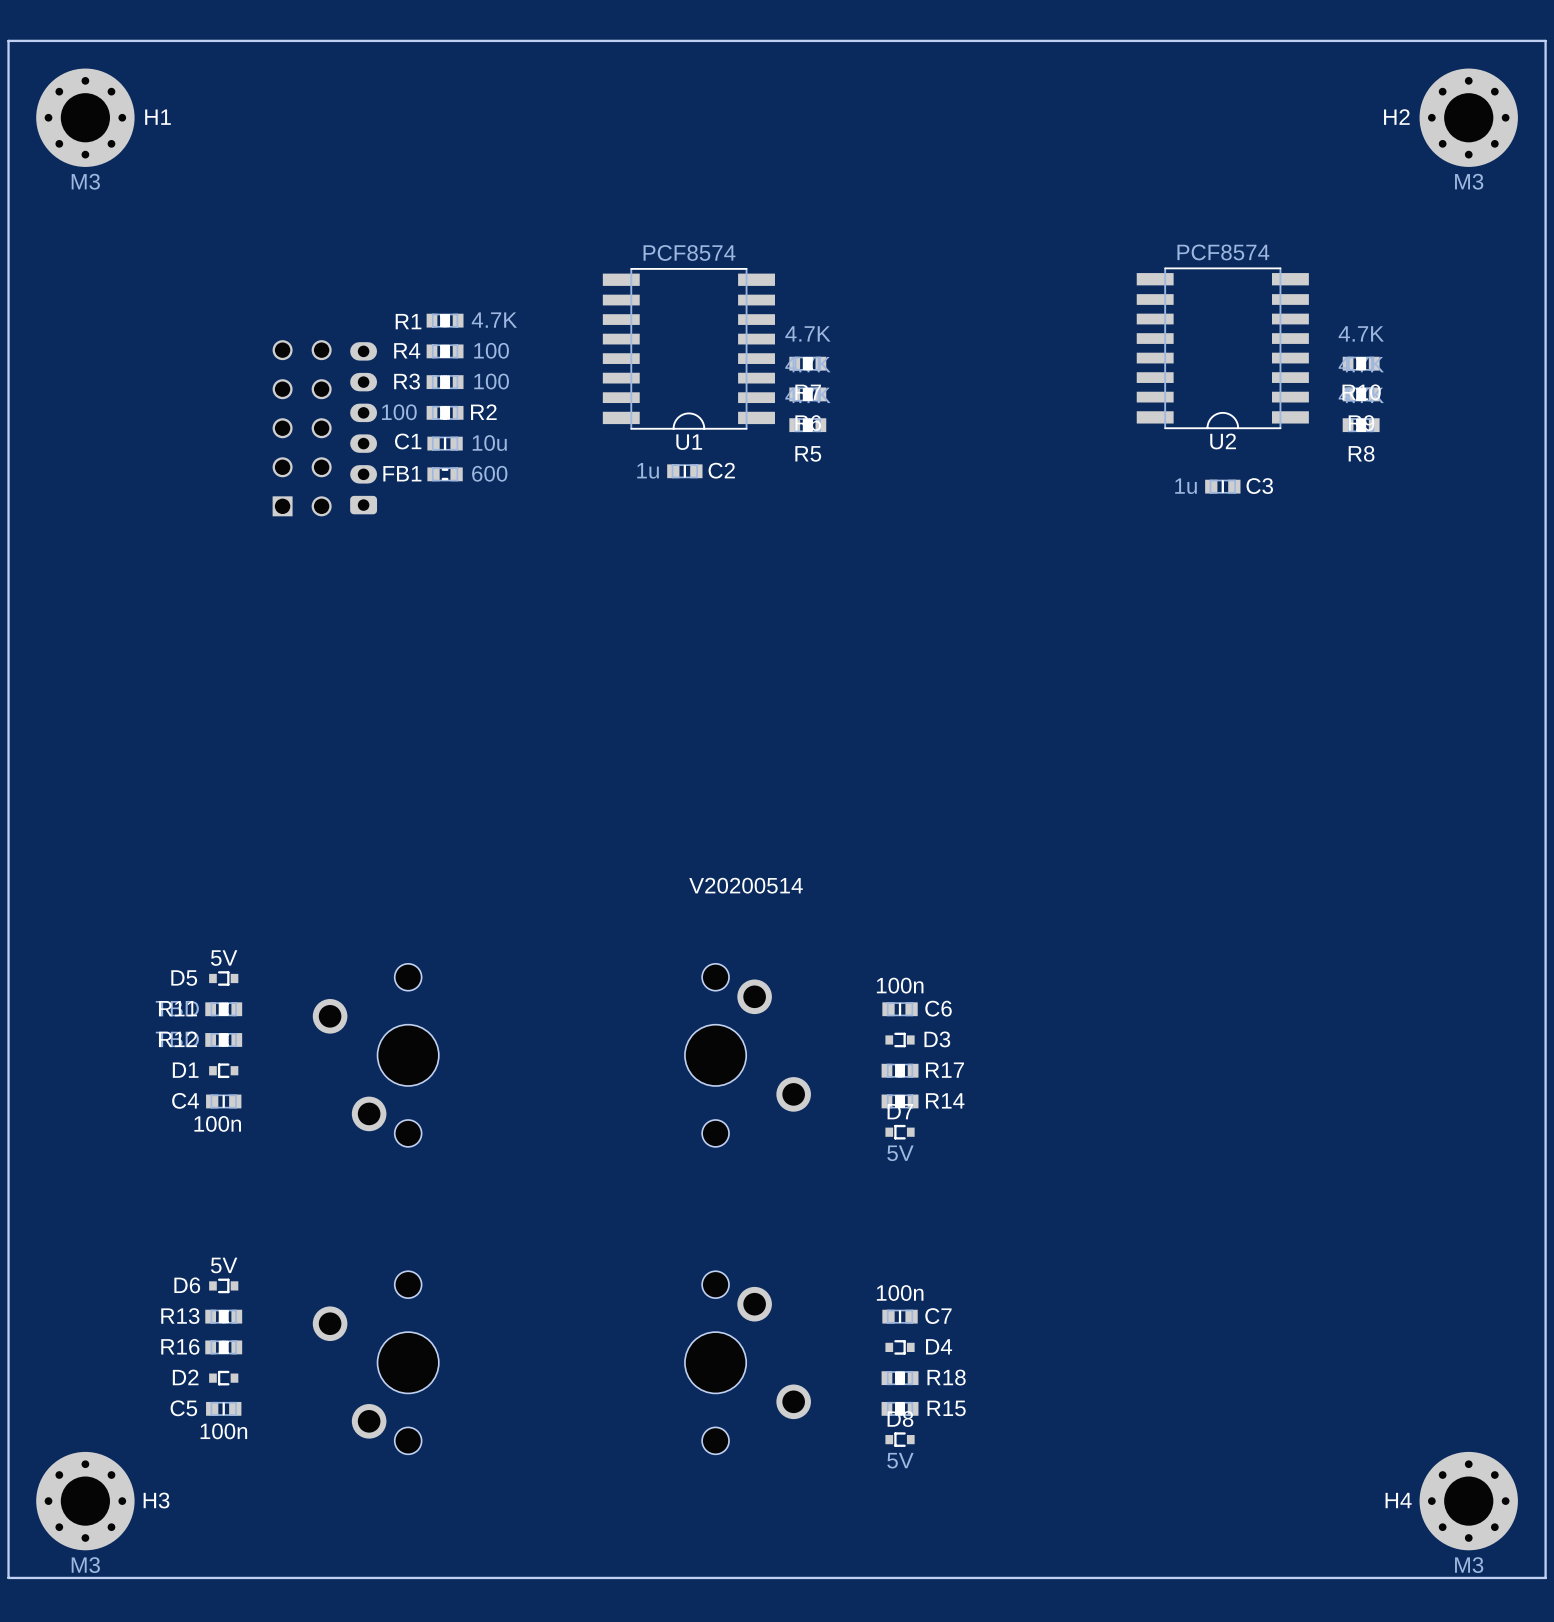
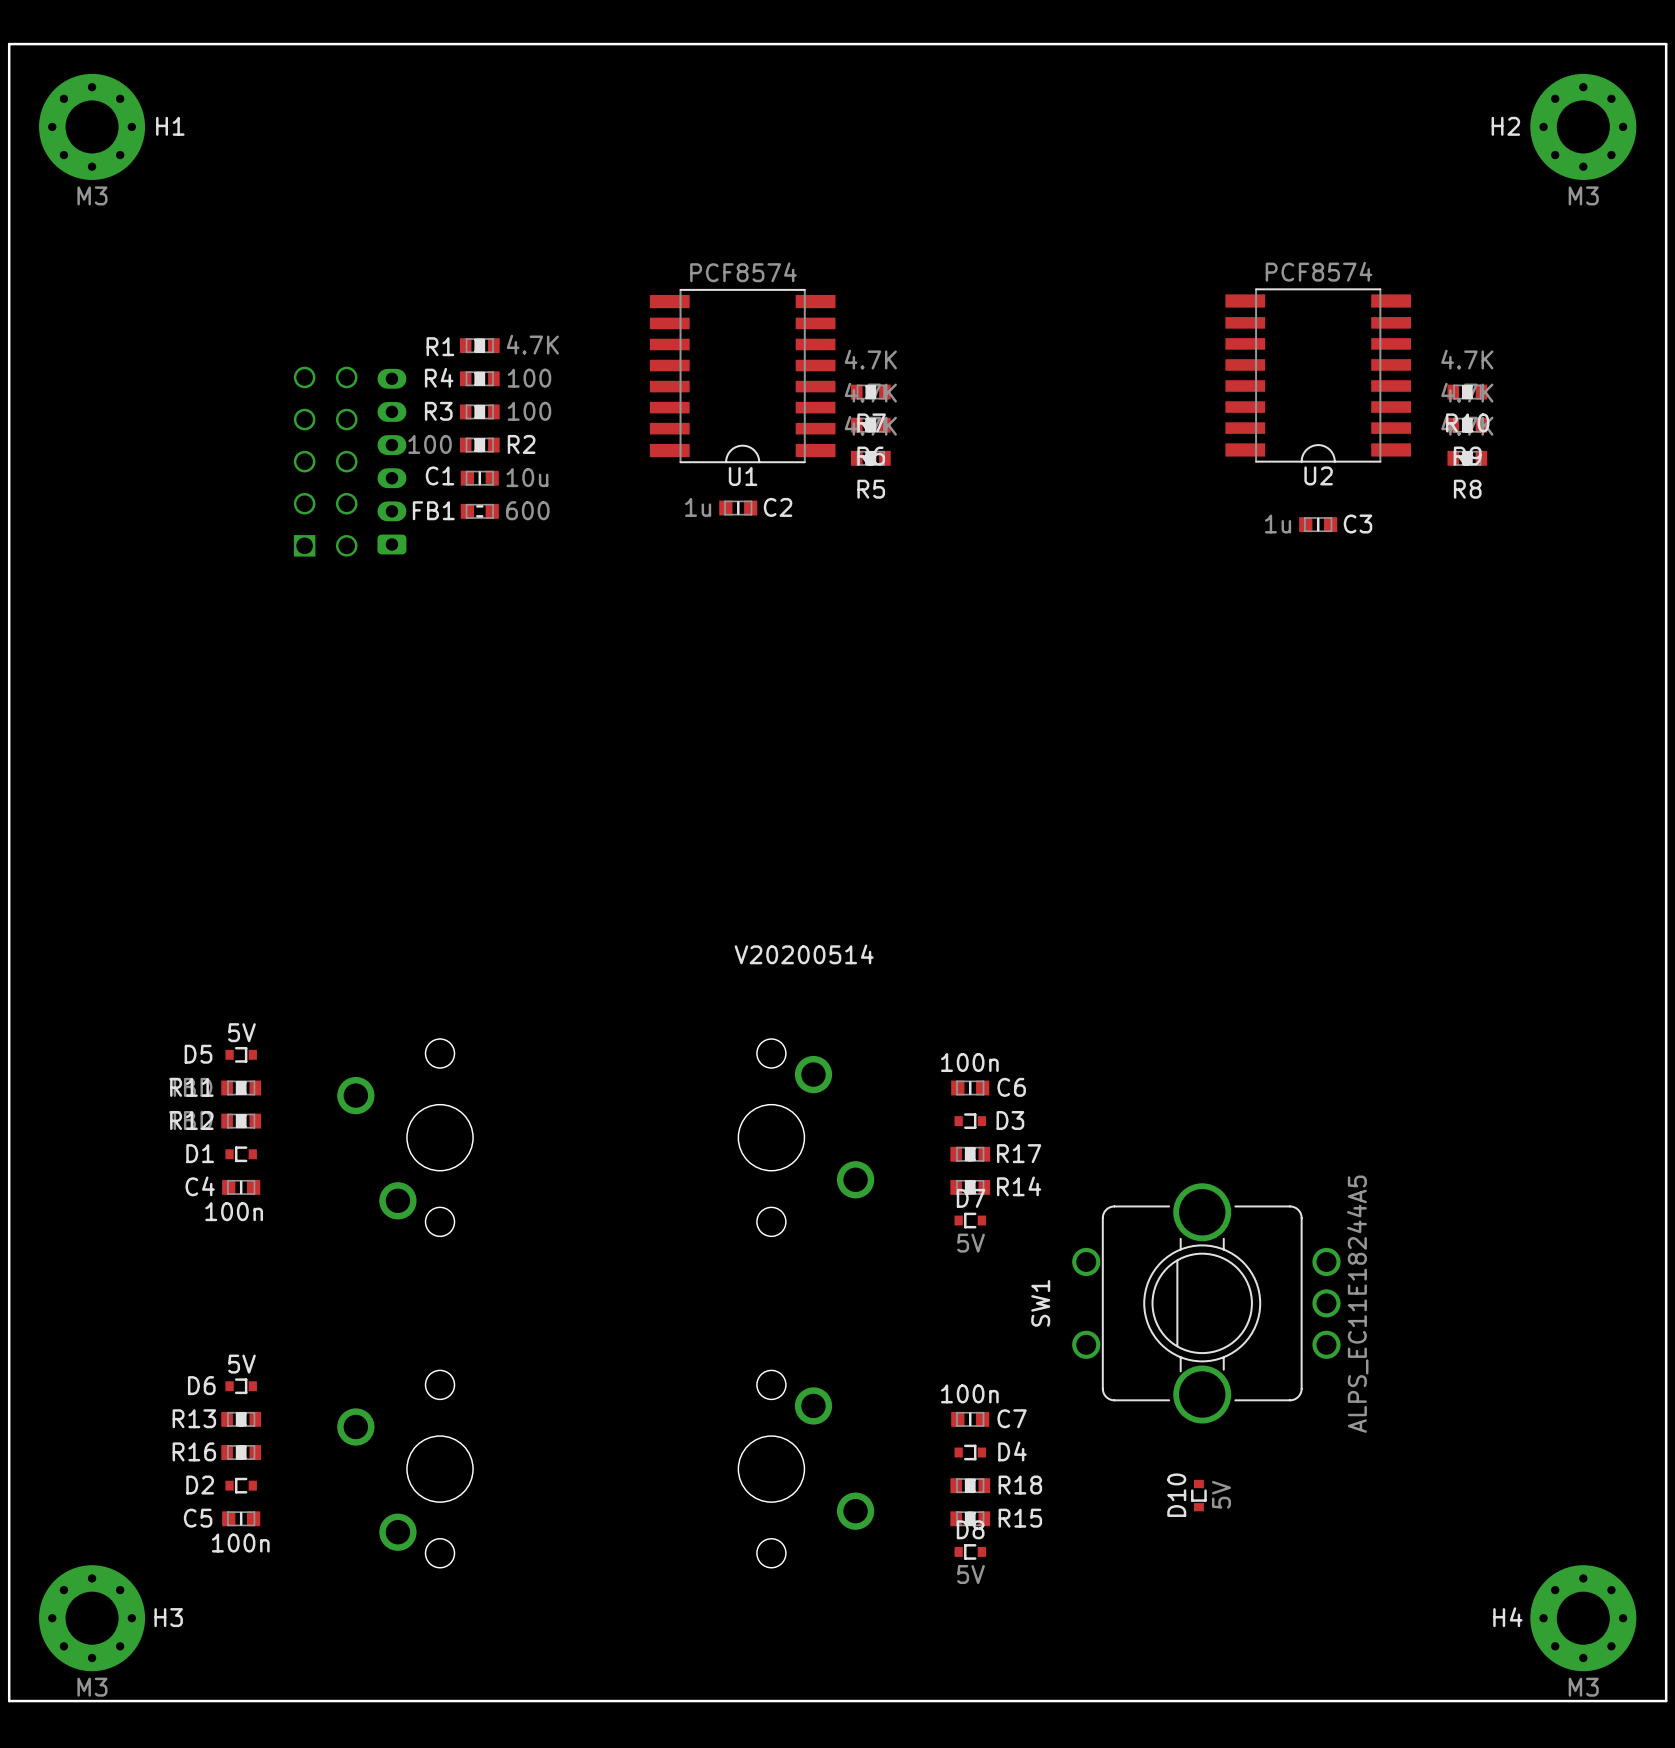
SW1: none -> ALPS_EC11E18244A5 (1206, 1303)
D10: none -> 5V (1198, 1495)

